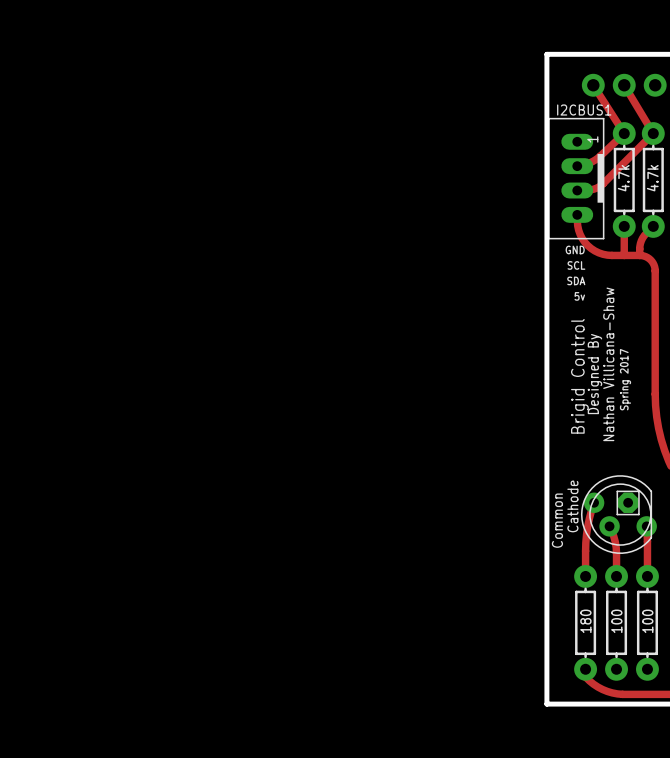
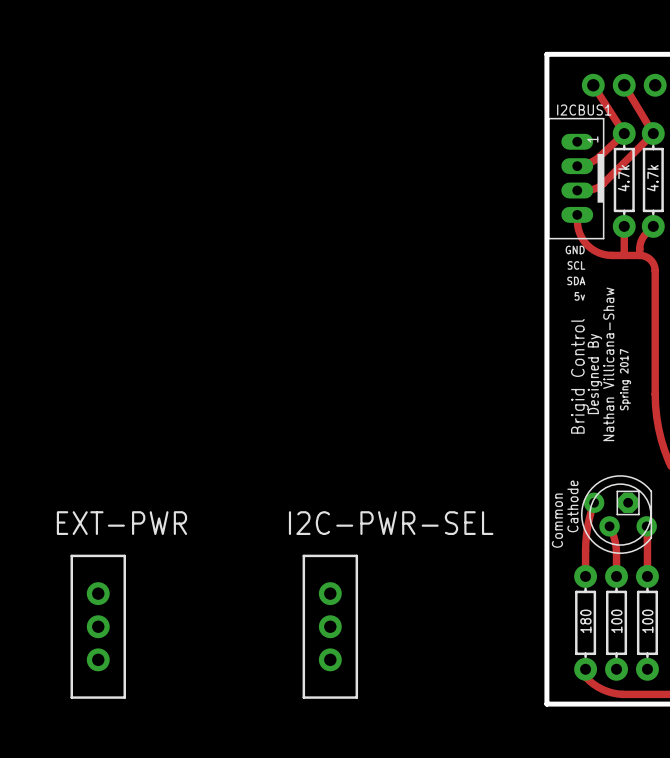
EXT-PWR: none -> (98, 626)
I2C-PWR-SEL: none -> (330, 626)

